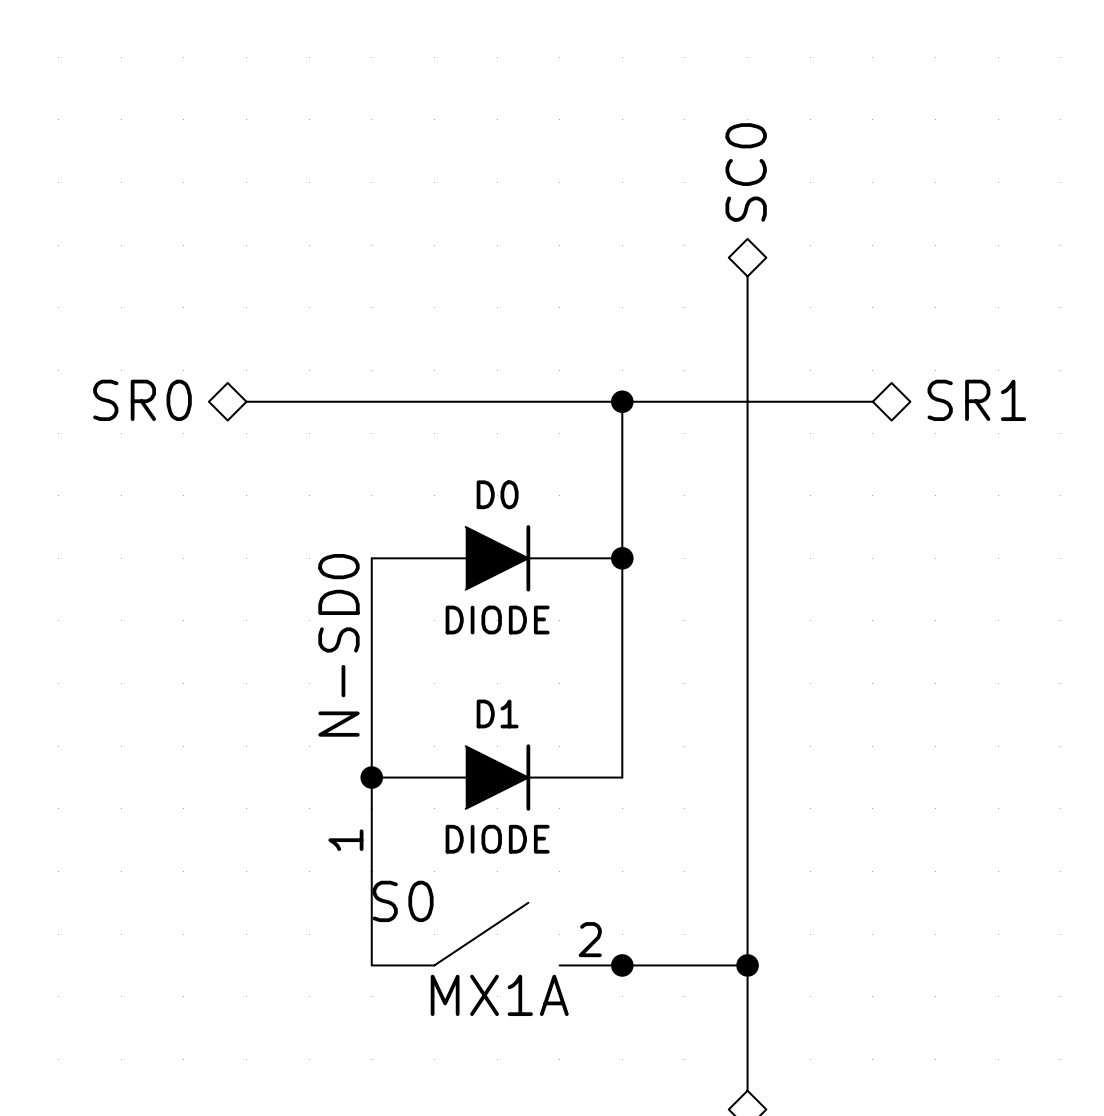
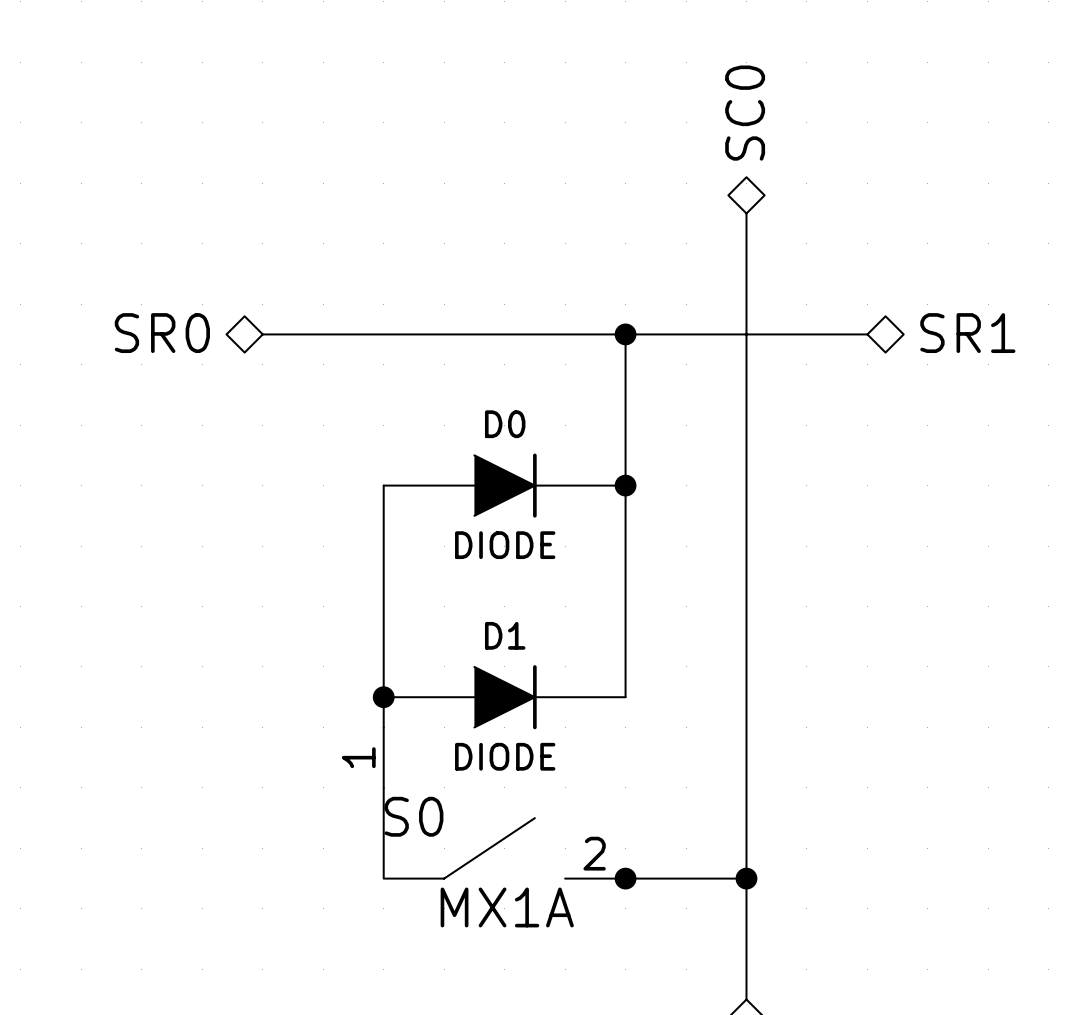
label: N-SD0 (338, 645) -> none

